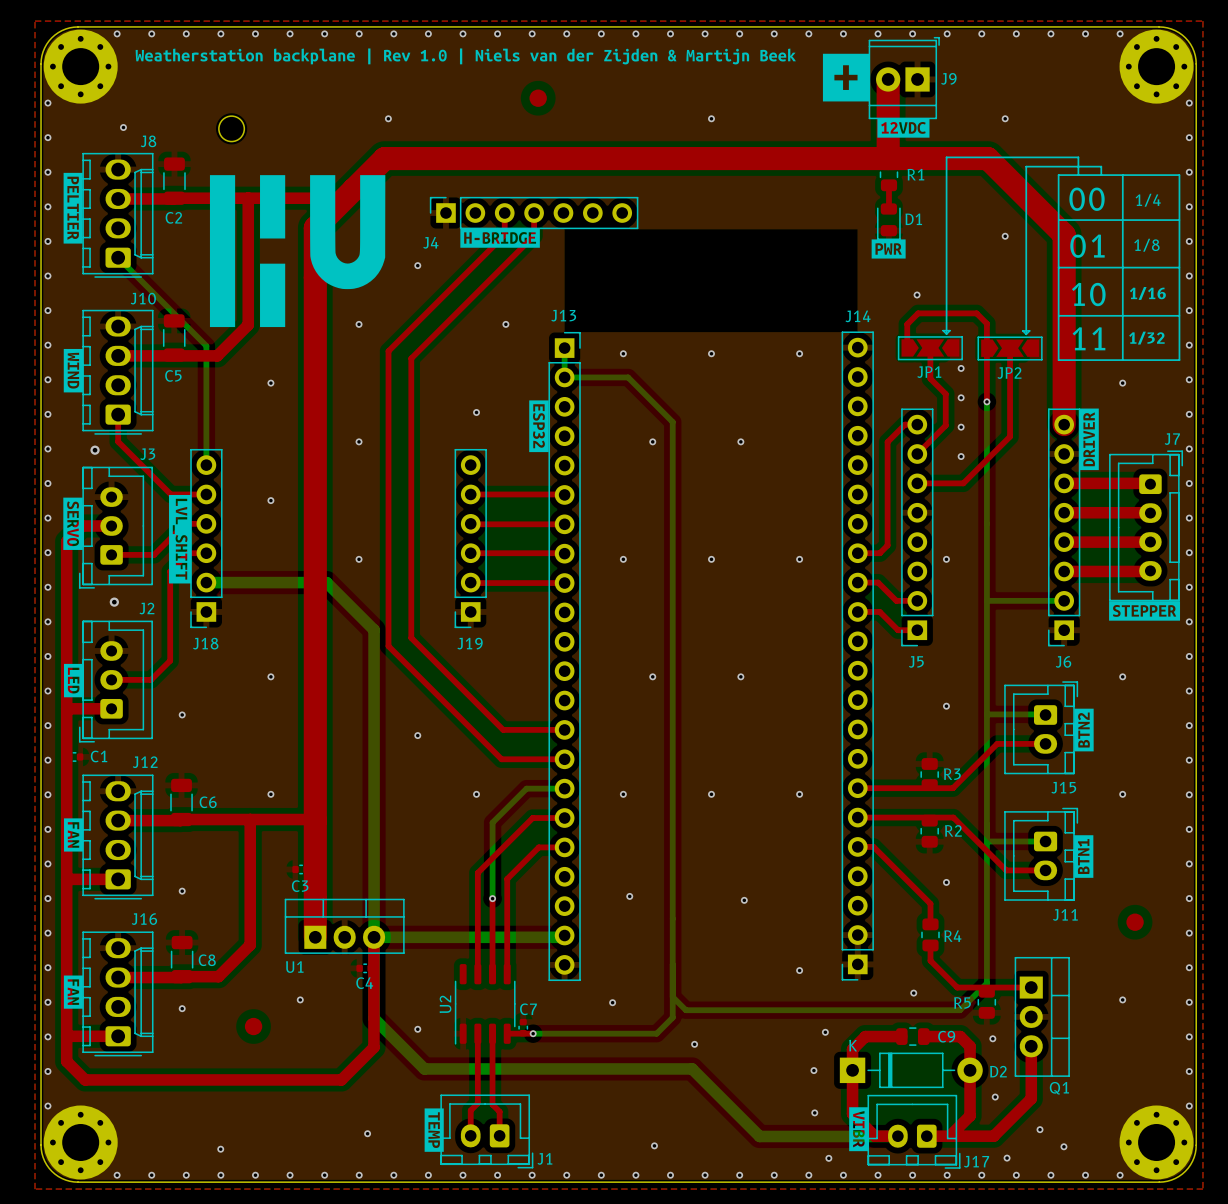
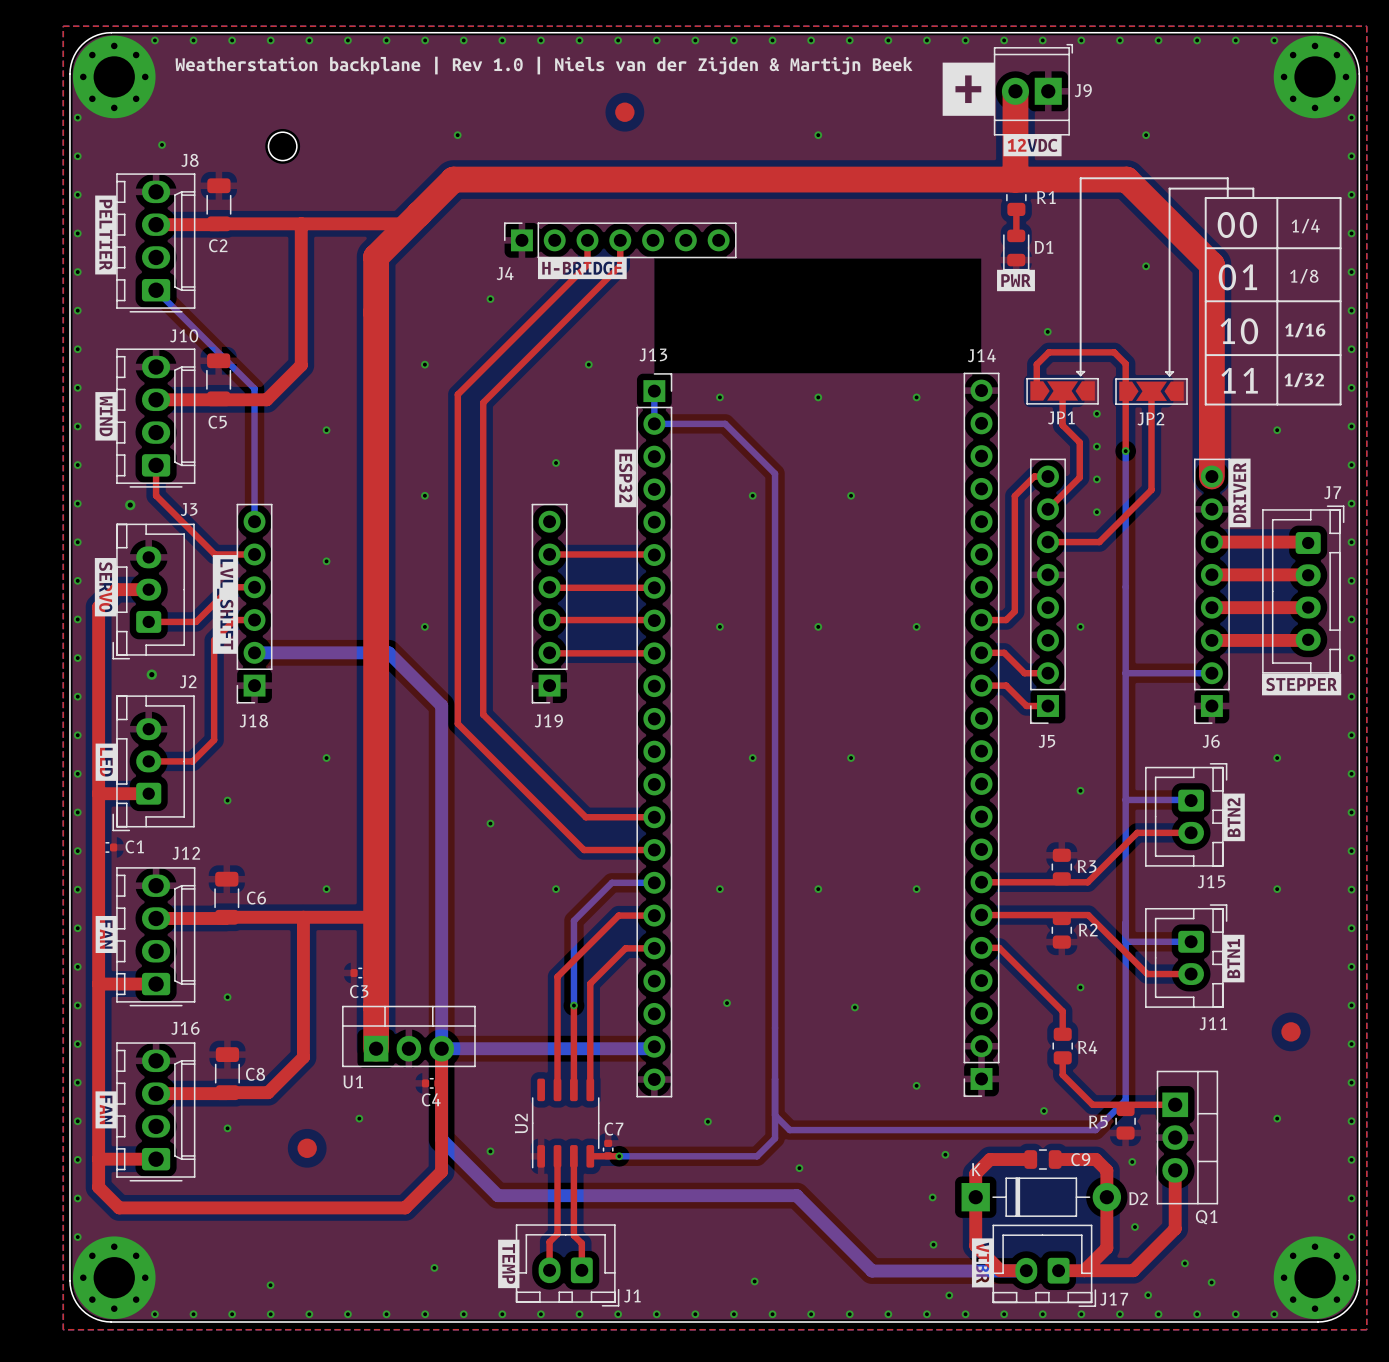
drawing: [209, 175, 386, 328] -> none

